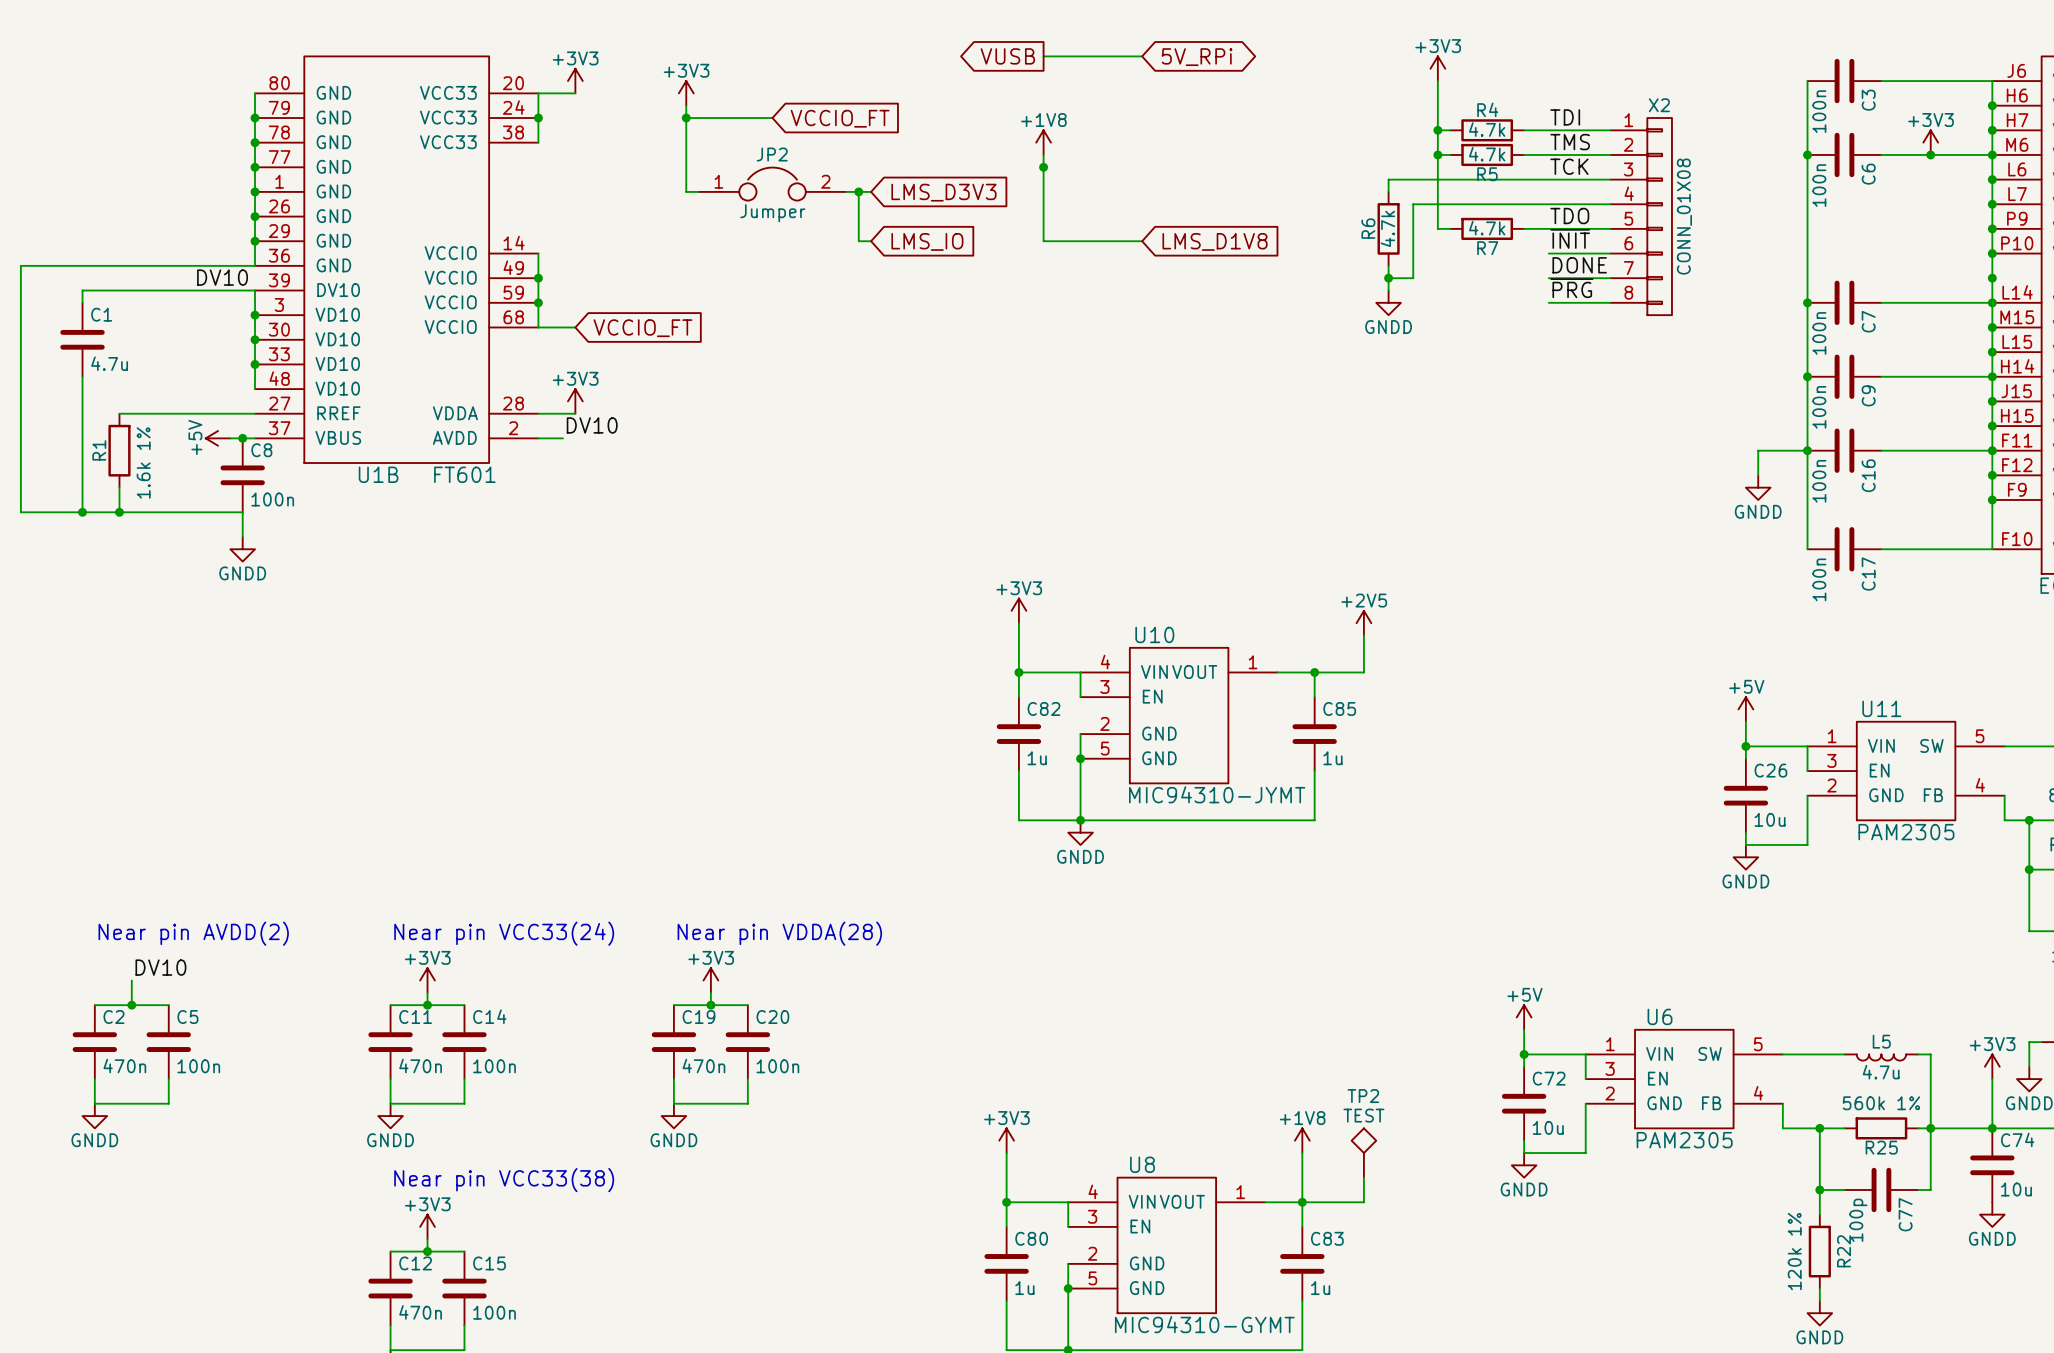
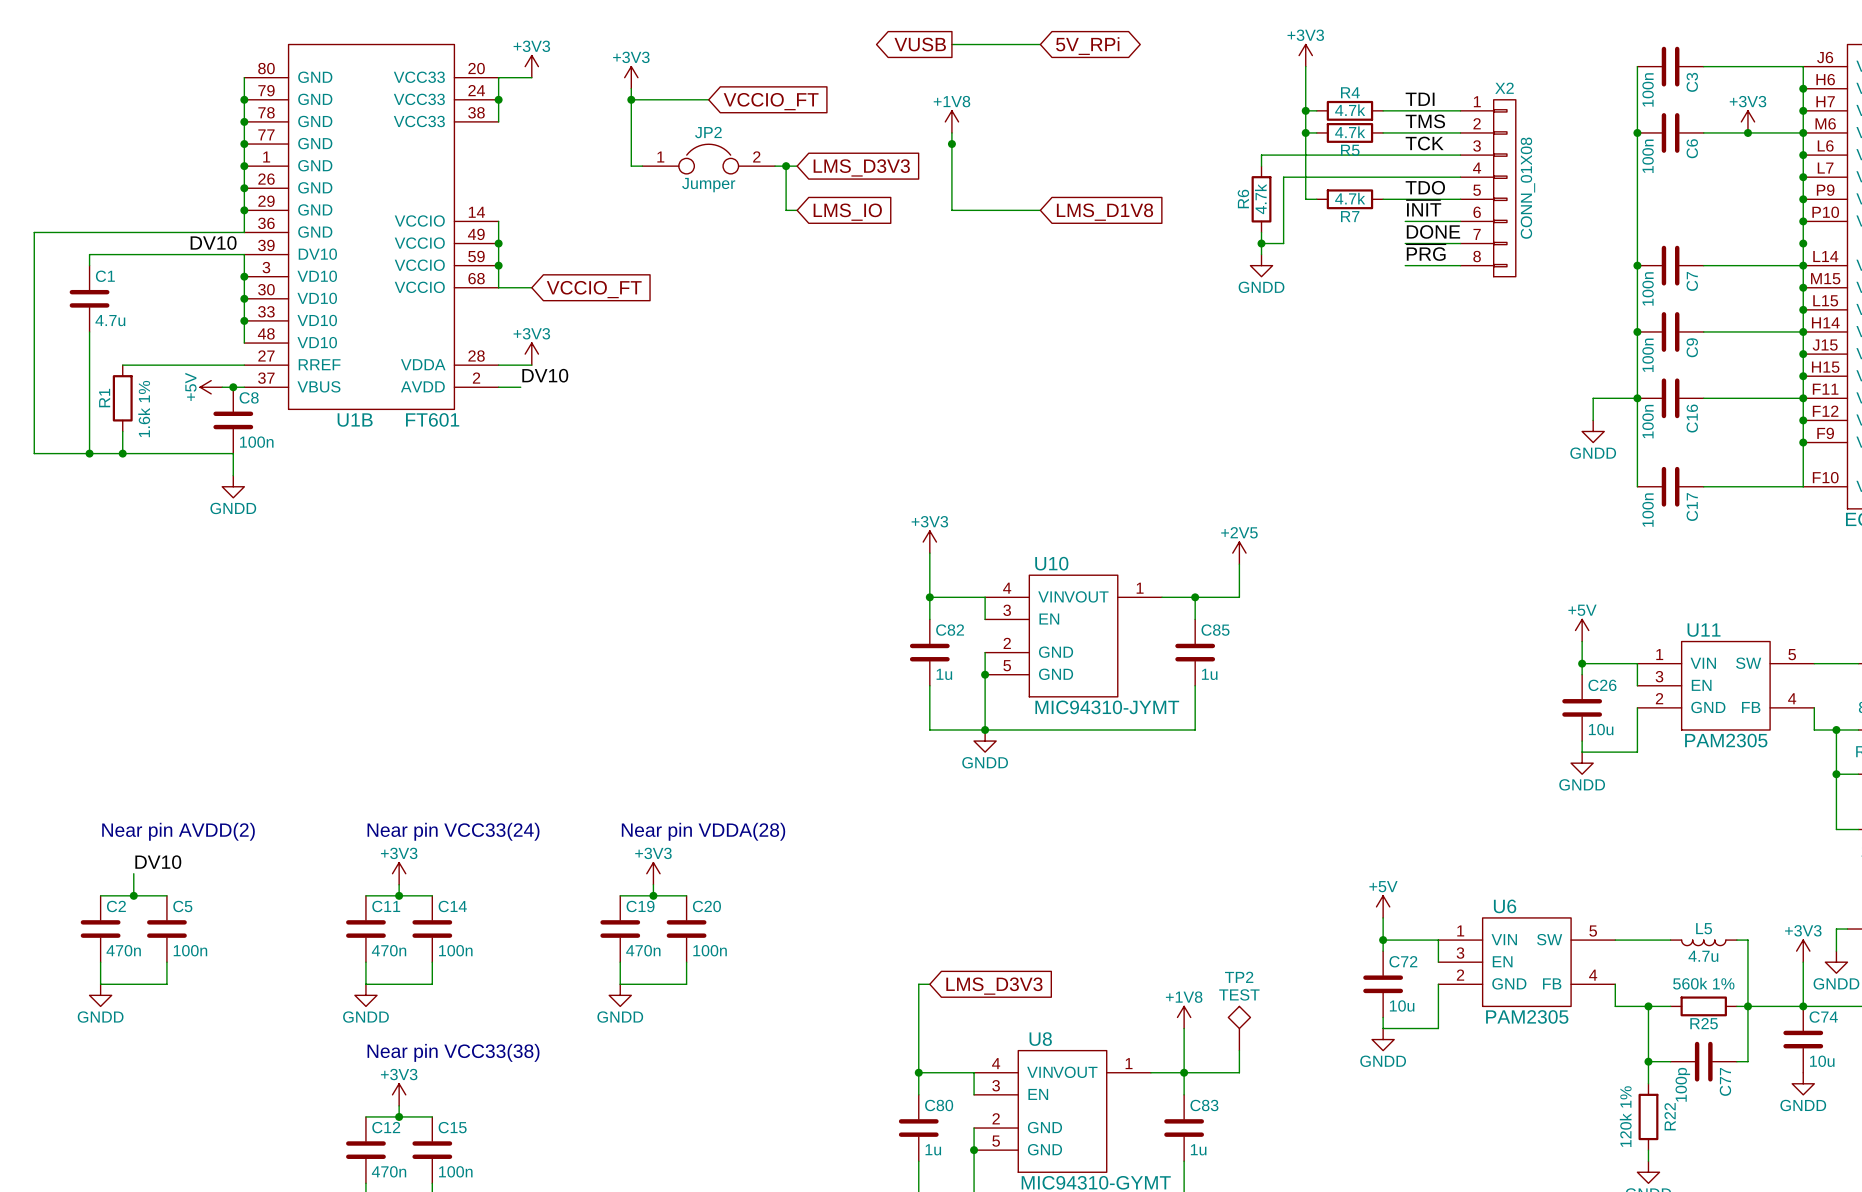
wire: none -> (929, 984) (918, 984) (918, 1028)
global label: none -> LMS_D3V3 (994, 986)
power symbol: +3V3 (1006, 1140) -> none

